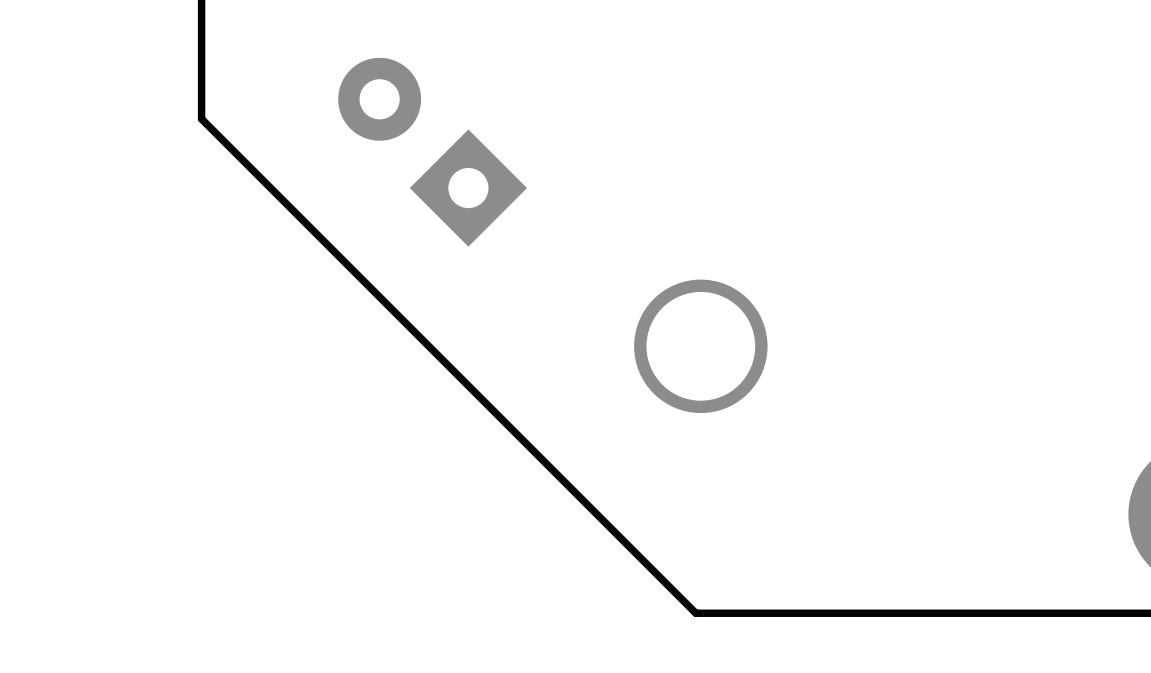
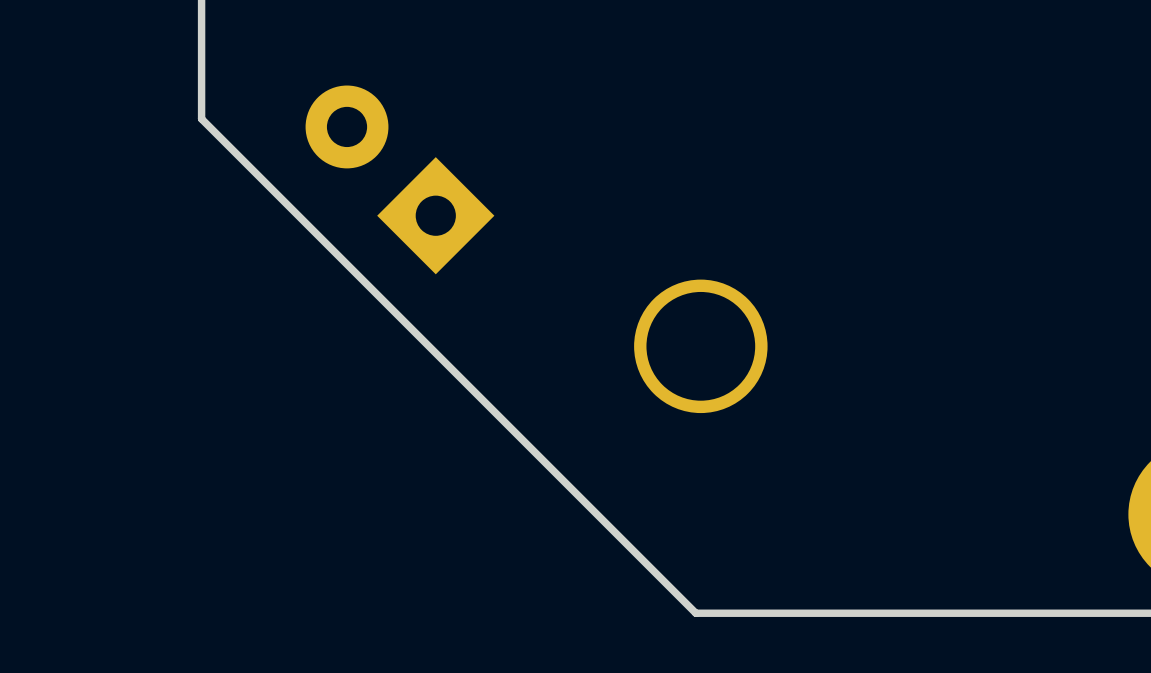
part position: (432, 152) -> (399, 179)

